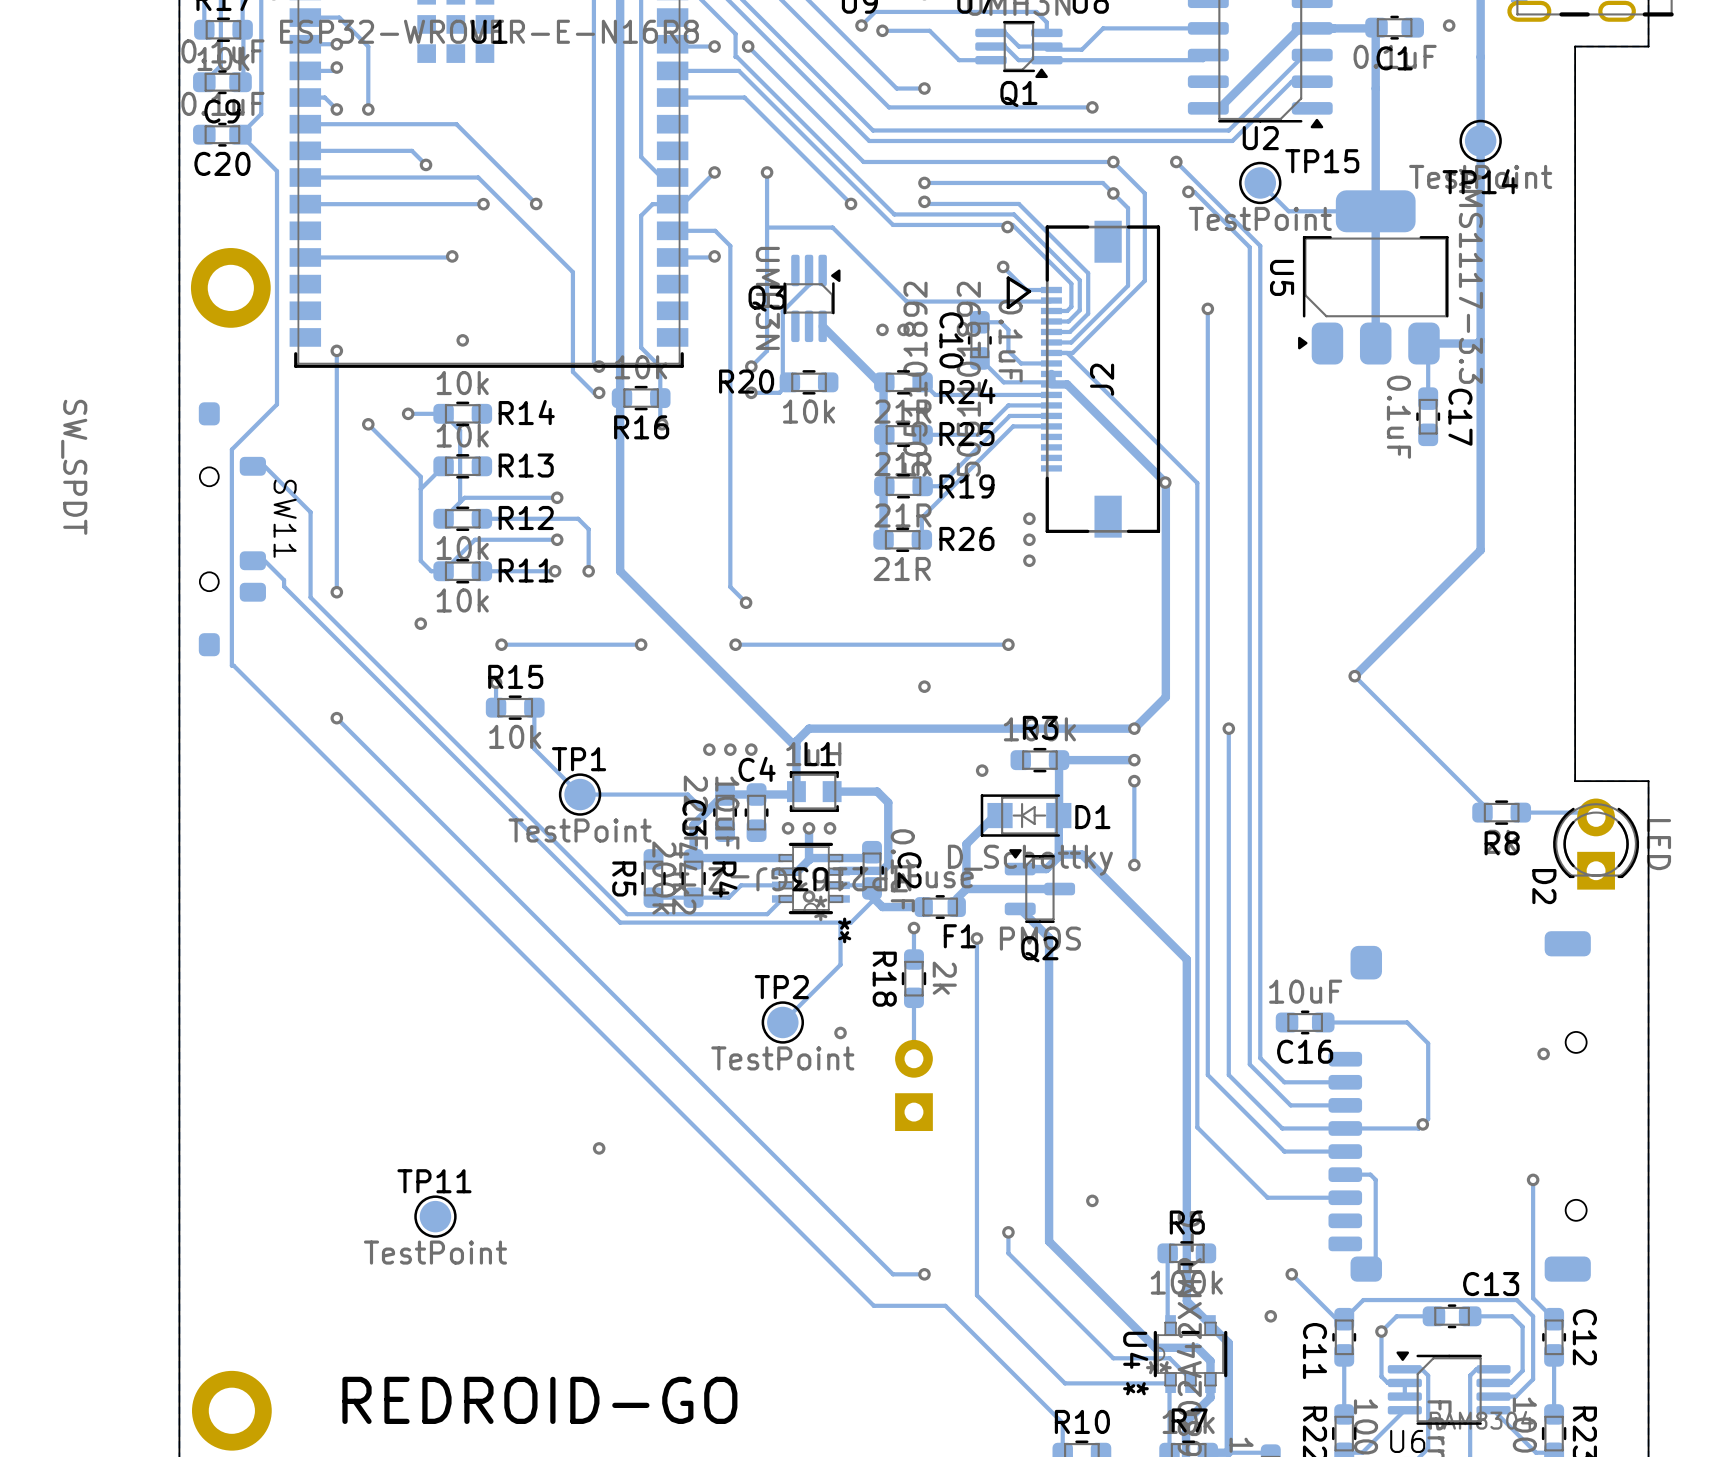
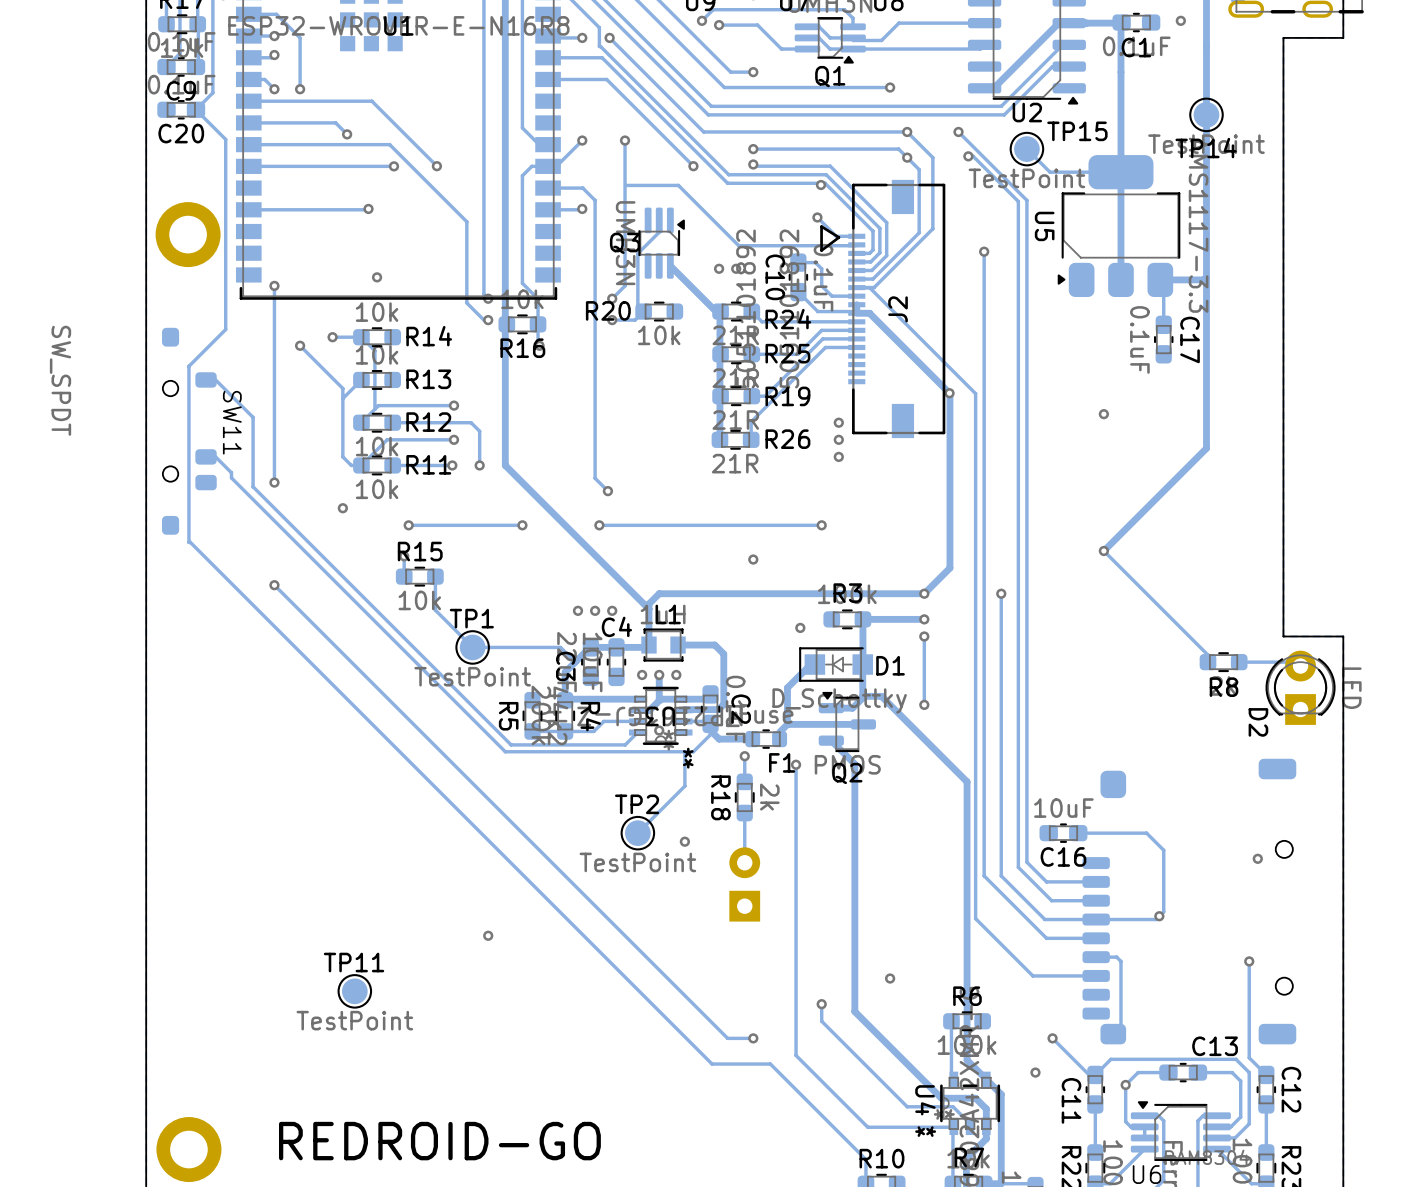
via: none -> (1103, 414)

